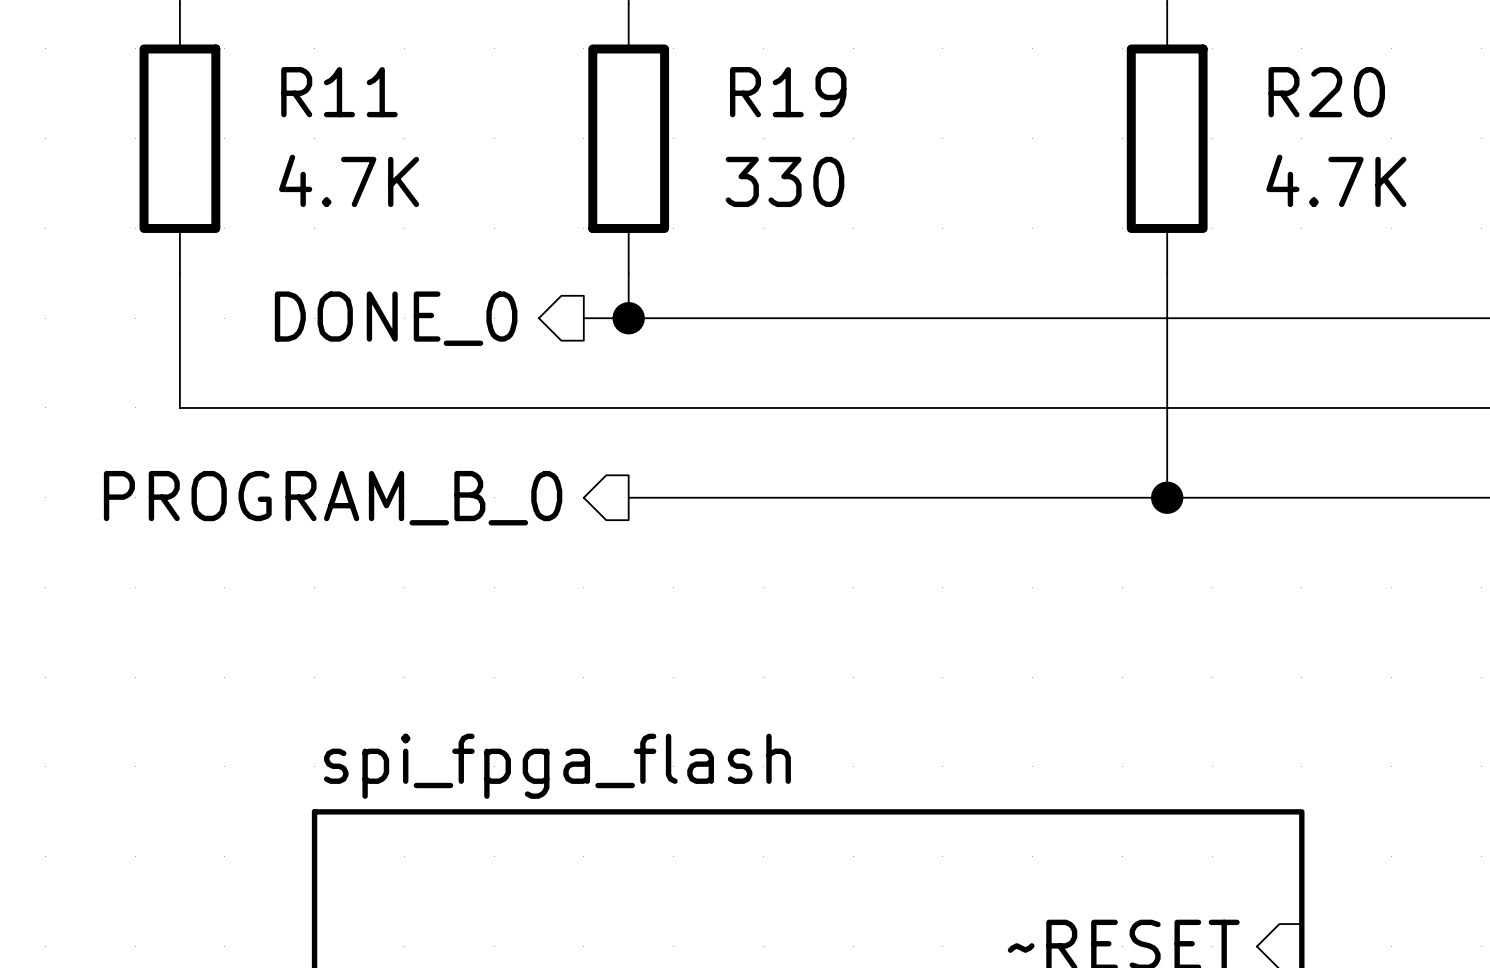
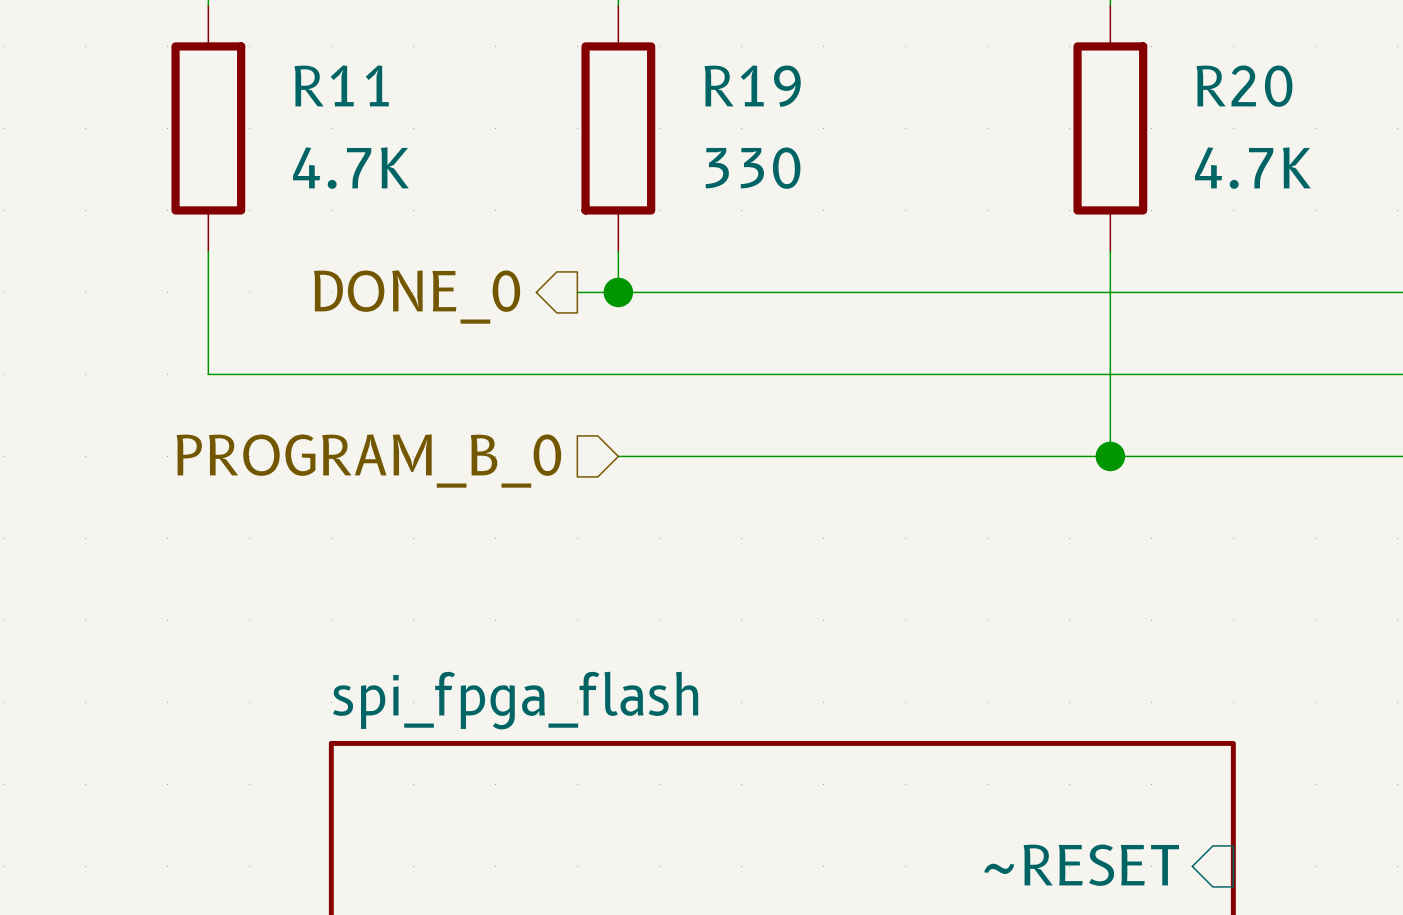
hierarchical label shape: output (333, 498) -> input (368, 461)

